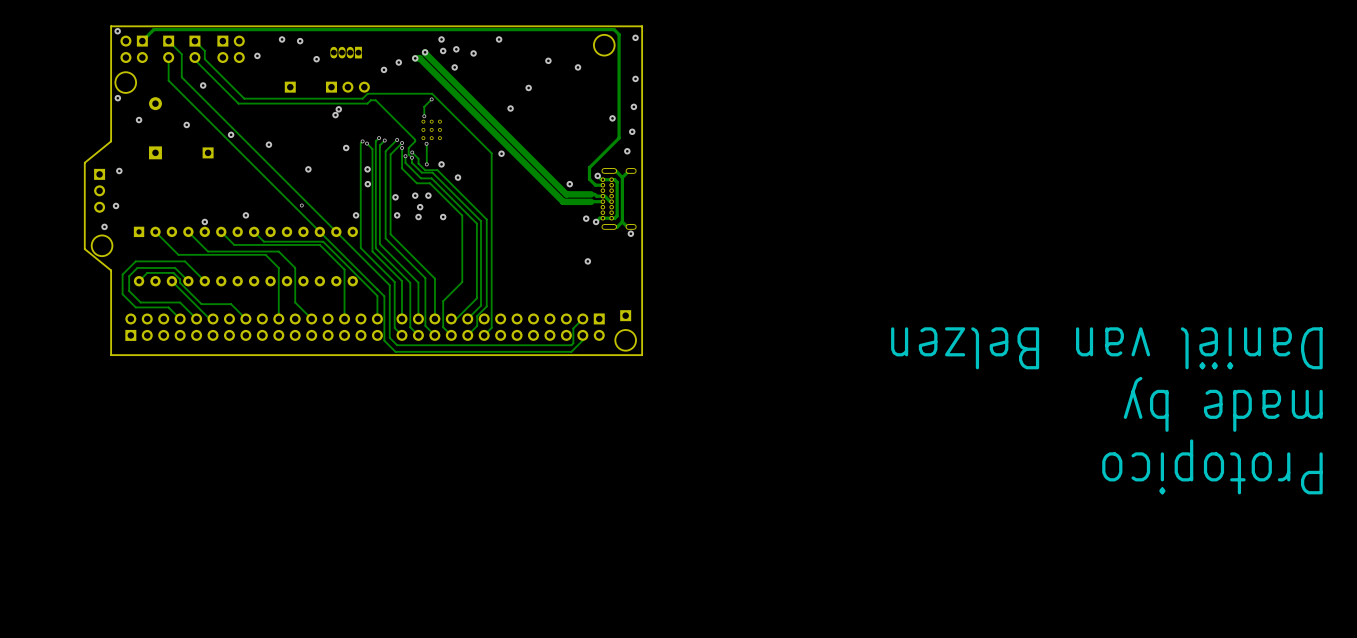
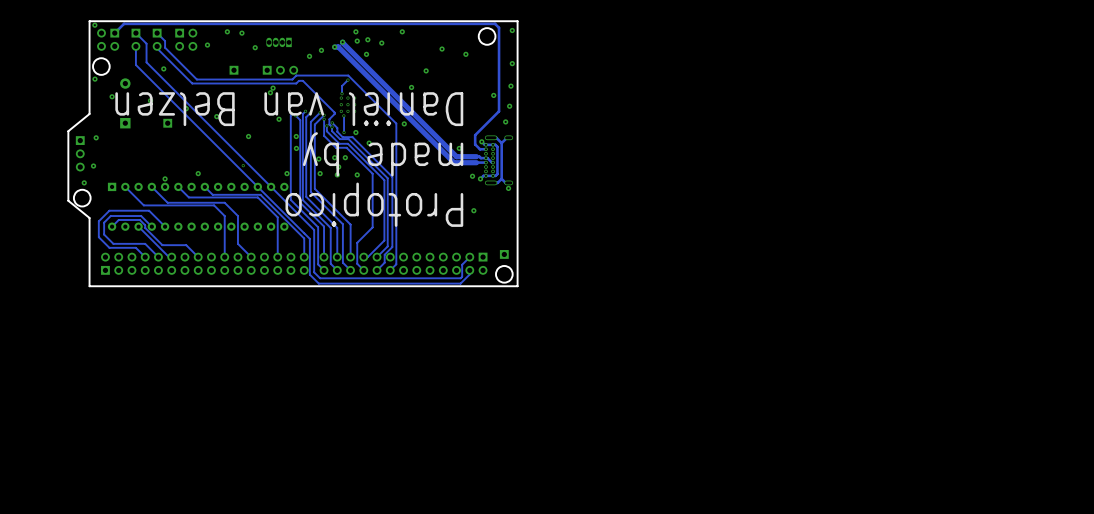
text: none -> Daniël van Belzen (289, 109)
text: none -> made by (383, 154)
text: none -> Protopico (374, 204)
text: Daniël van Belzen (1106, 348) -> none
text: made by (1223, 404) -> none
text: Protopico (1212, 466) -> none

